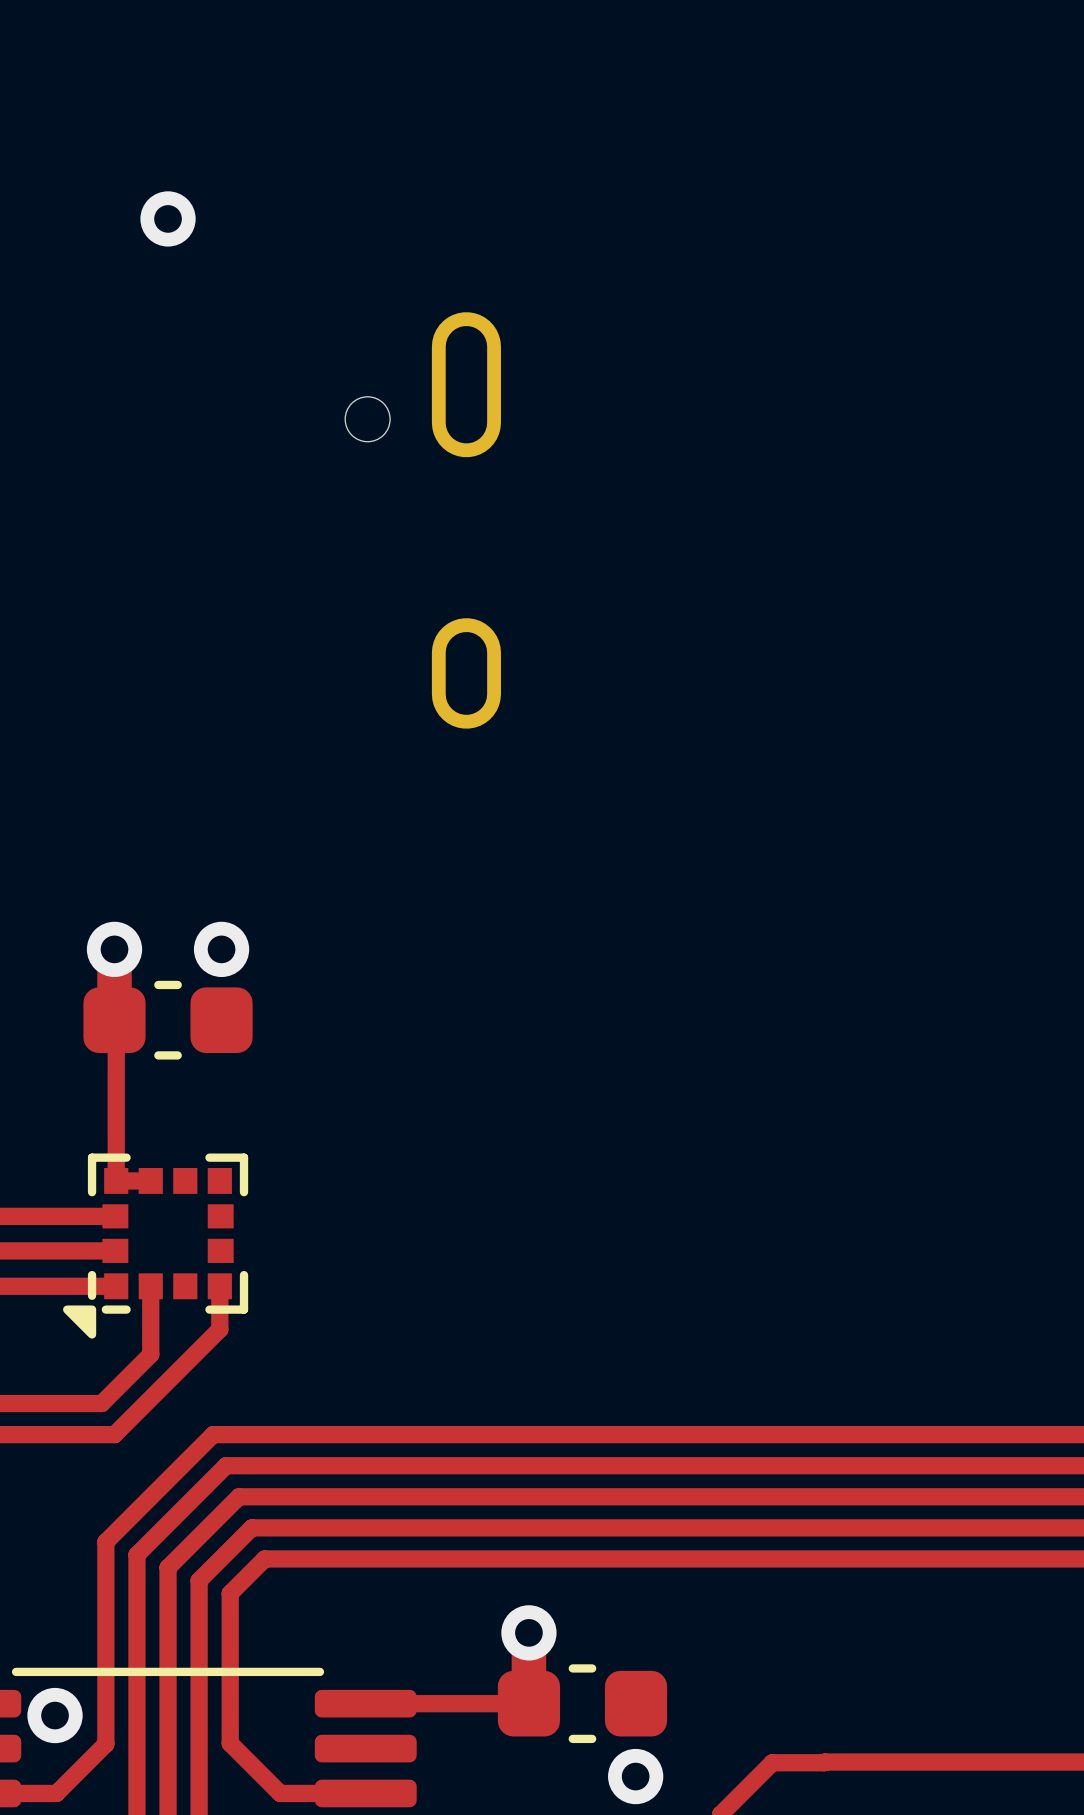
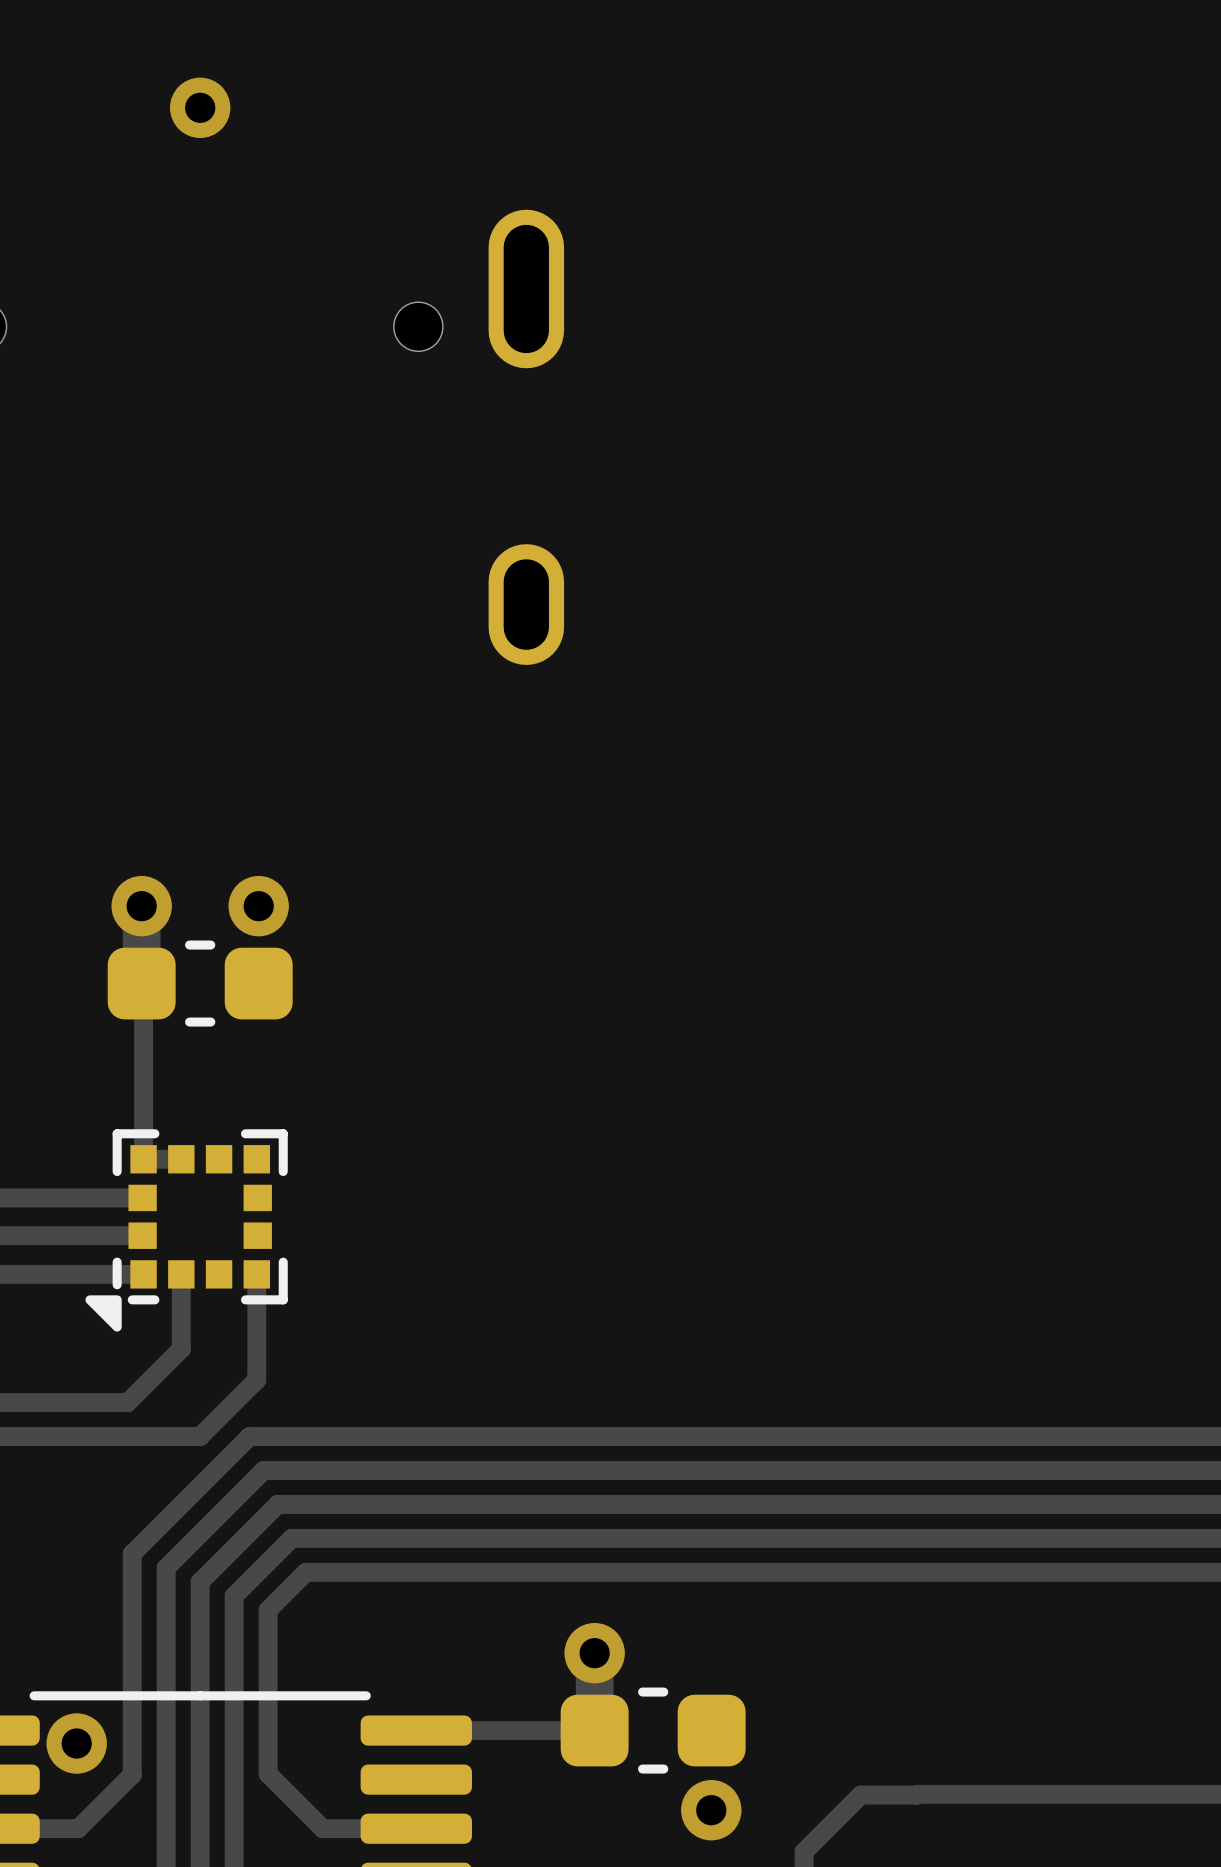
track: (219, 1329) (114, 1434) -> (256, 1321) (256, 1379) (200, 1436) (141, 1436)

